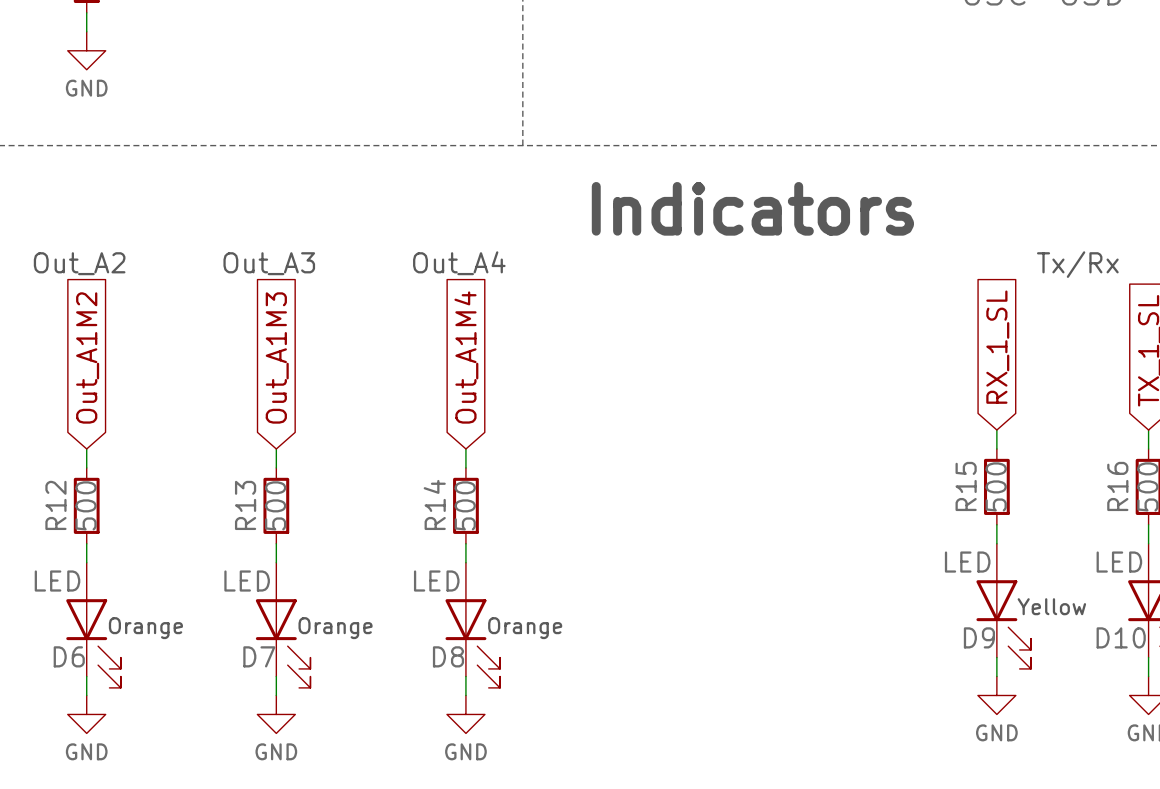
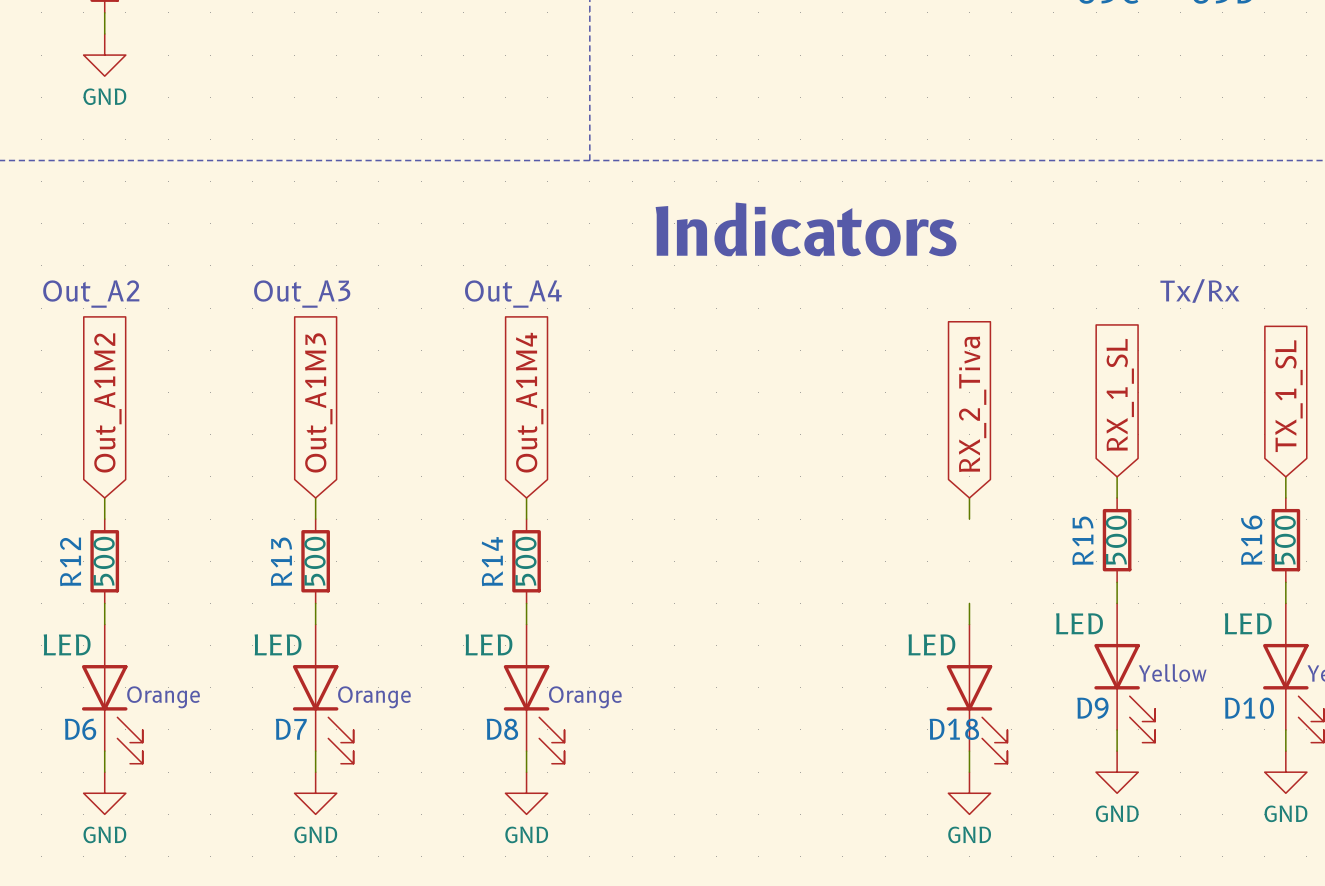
global label: none -> RX_2_Tiva (972, 404)
wire: none -> (969, 497) (969, 519)
wire: none -> (969, 603) (969, 624)
D18: none -> LED (977, 694)
wire: none -> (969, 751) (969, 772)
power symbol: none -> GND (969, 793)

